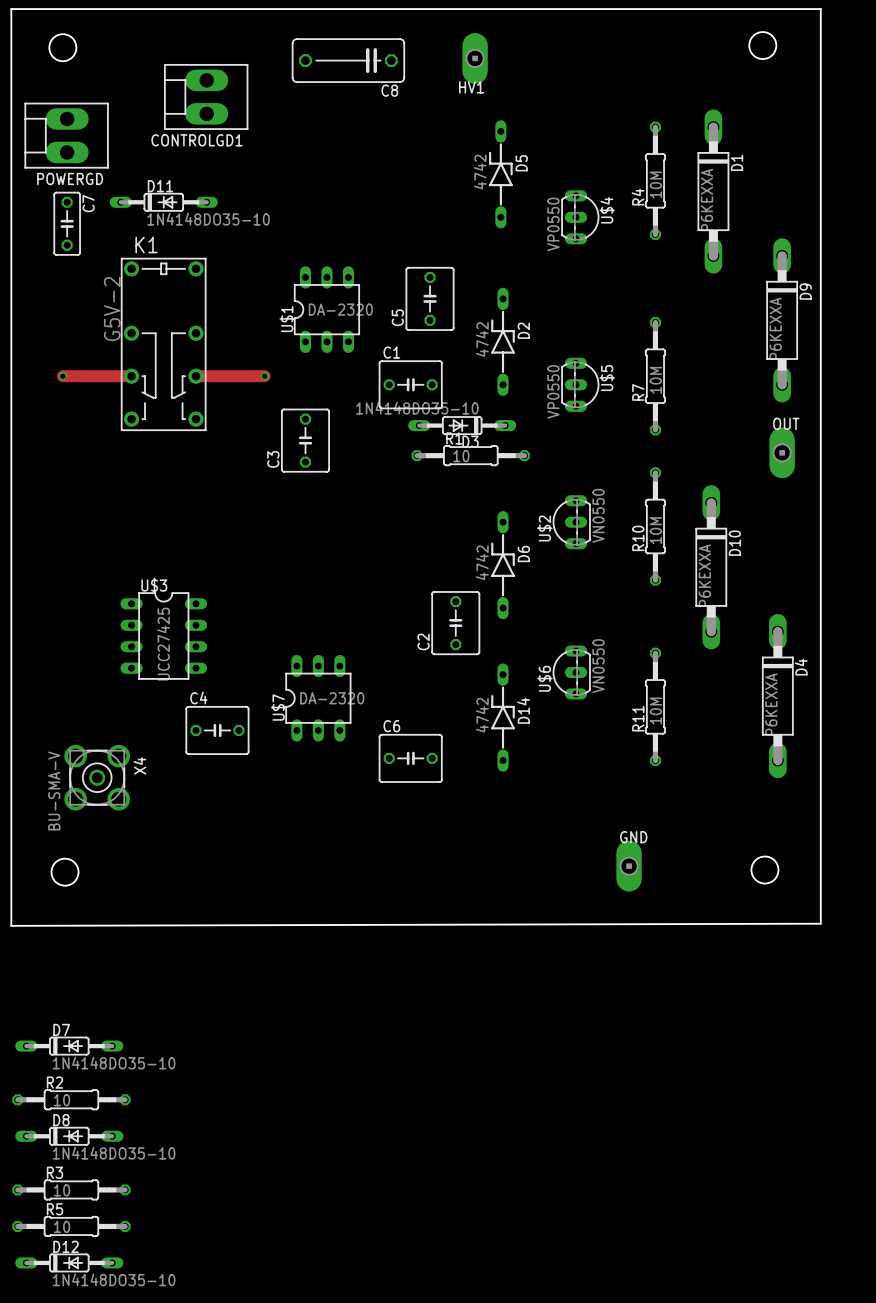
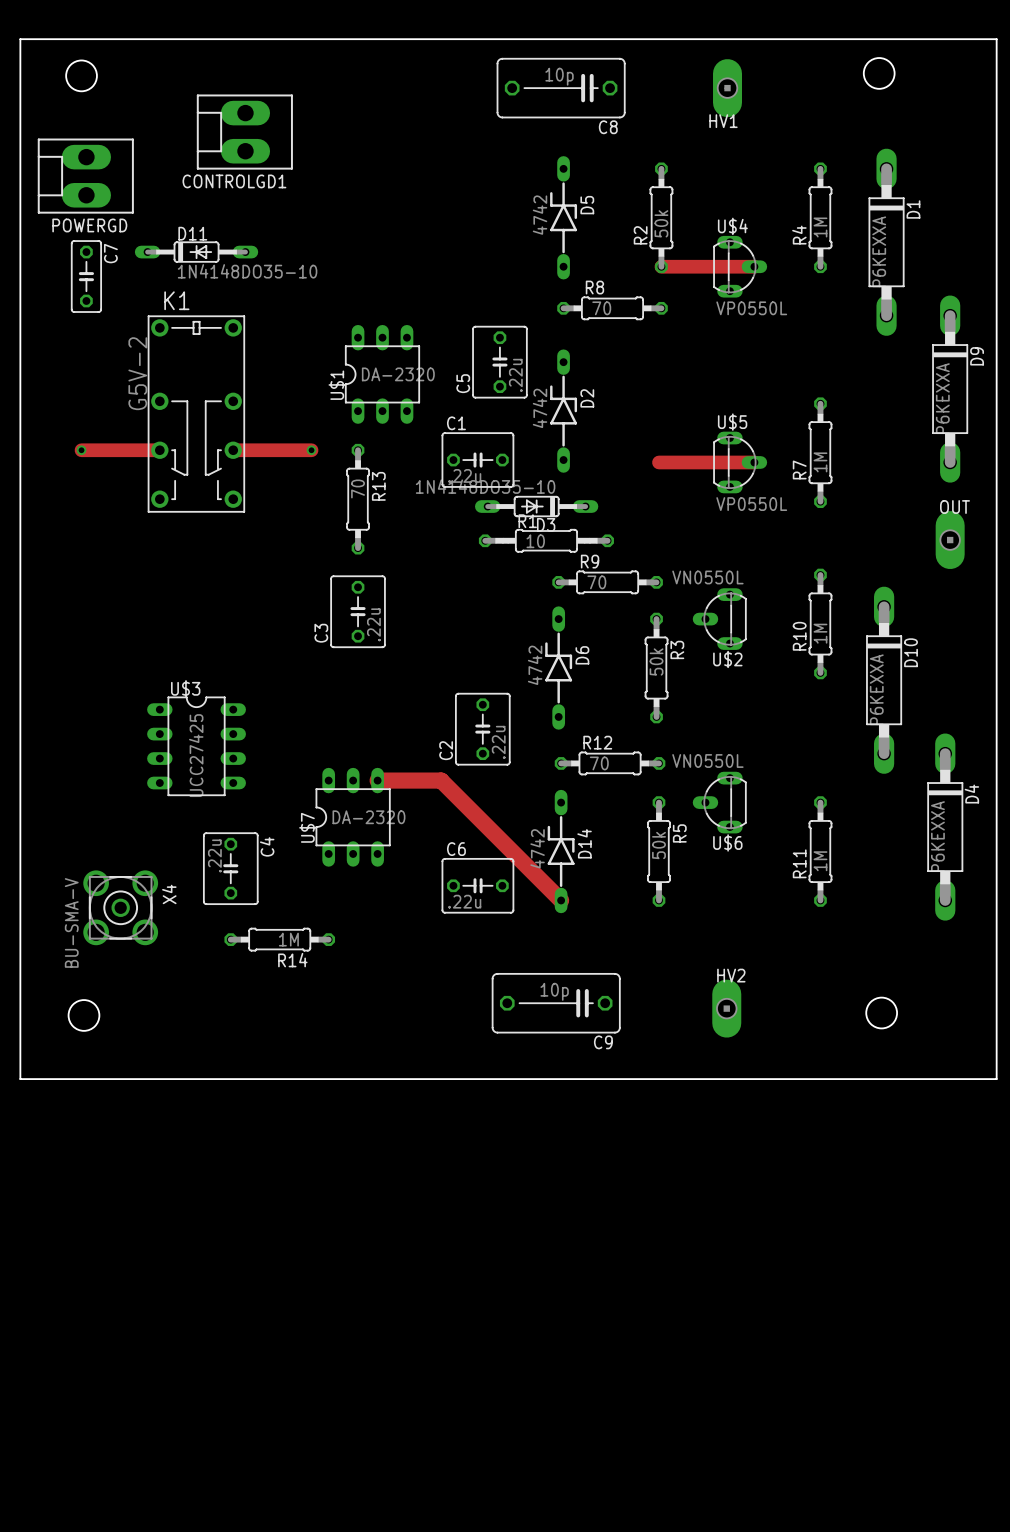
board edge: (11, 9) (820, 9) (820, 923) (11, 925) (11, 9) -> (20, 39) (20, 1079) (996, 1079) (996, 39) (20, 39)
C8 footprint: [291, 38, 405, 83] -> [496, 58, 626, 119]
C8 value: none -> 10p (559, 76)
HV1 position: (475, 58) -> (727, 88)
R4 footprint: [645, 121, 666, 241] -> [808, 162, 833, 274]
D5 position: (500, 174) -> (563, 217)
R4 value: 10M (655, 184) -> 1M (820, 227)
U$4 footprint: [561, 190, 600, 245] -> [713, 235, 768, 298]
D1 position: (713, 191) -> (886, 242)
U$4 name position: U$4 (607, 210) -> U$4 (732, 226)
track: none -> (661, 266) (754, 266)
U$4 value: VP0550 (553, 224) -> VP0550L (751, 308)
R8: none -> 70 (612, 308)
C5 value: none -> .22u (515, 375)
R7 footprint: [645, 316, 666, 436] -> [808, 397, 833, 508]
D9 position: (782, 320) -> (950, 389)
D2 position: (503, 341) -> (563, 411)
U$5 footprint: [561, 357, 600, 412] -> [713, 431, 768, 494]
U$5 name position: U$5 (607, 378) -> U$5 (732, 422)
R7 value: 10M (655, 380) -> 1M (820, 462)
track: none -> (658, 462) (754, 462)
U$5 value: VP0550 (553, 391) -> VP0550L (751, 504)
C1 value: none -> .22u (464, 475)
R13: none -> 70 (358, 499)
C3 position: (305, 440) -> (358, 611)
OUT position: (782, 452) -> (950, 540)
R10 footprint: [645, 467, 666, 586] -> [808, 568, 833, 680]
R9: none -> 70 (607, 582)
U$2 footprint: [552, 495, 591, 550] -> [692, 588, 747, 650]
U$2 value: VN0550 (598, 515) -> VN0550L (707, 577)
U$2 name position: U$2 (544, 528) -> U$2 (727, 659)
C3 value: none -> .22u (373, 624)
R10 value: 10M (655, 530) -> 1M (820, 633)
D6 position: (503, 565) -> (558, 668)
D10 position: (711, 567) -> (884, 680)
C2 position: (455, 623) -> (482, 729)
C2 value: none -> .22u (498, 742)
U$6 footprint: [552, 645, 591, 700] -> [692, 771, 747, 834]
R11 footprint: [645, 647, 666, 767] -> [808, 796, 833, 907]
R12: none -> 70 (610, 763)
track: none -> (377, 780) (441, 780) (561, 900)
U$6 value: VN0550 (598, 666) -> VN0550L (707, 760)
U$6 name position: U$6 (544, 678) -> U$6 (727, 842)
D4 position: (777, 696) -> (945, 827)
U$7 position: (318, 698) -> (353, 817)
R11 value: 10M (655, 710) -> 1M (820, 861)
D14 position: (503, 717) -> (561, 851)
C4 rotation: 0° (217, 730) -> 90° clockwise (230, 868)
C4 value: none -> .22u (214, 856)
C6 value: none -> .22u (464, 901)
R14: none -> 1M (279, 939)
GND name: GND (633, 837) -> HV2 (731, 975)
C9: none -> 10p (556, 1003)
D7: 1N4148DO35-10 (69, 1046) -> none
R2 name position: R2 (54, 1082) -> R2 (640, 235)
R2 footprint: [12, 1089, 131, 1111] -> [649, 162, 674, 274]
R2 value: 10 (62, 1100) -> 50k (661, 223)
D8: 1N4148DO35-10 (69, 1136) -> none
R3 name position: R3 (54, 1172) -> R3 (677, 649)
R3 footprint: [12, 1179, 131, 1201] -> [644, 612, 669, 724]
R3 value: 10 (62, 1190) -> 50k (656, 661)
R5 name position: R5 (54, 1209) -> R5 (679, 833)
R5 footprint: [12, 1216, 131, 1237] -> [647, 796, 671, 907]
R5 value: 10 (62, 1226) -> 50k (658, 845)
D12: 1N4148DO35-10 (69, 1262) -> none

